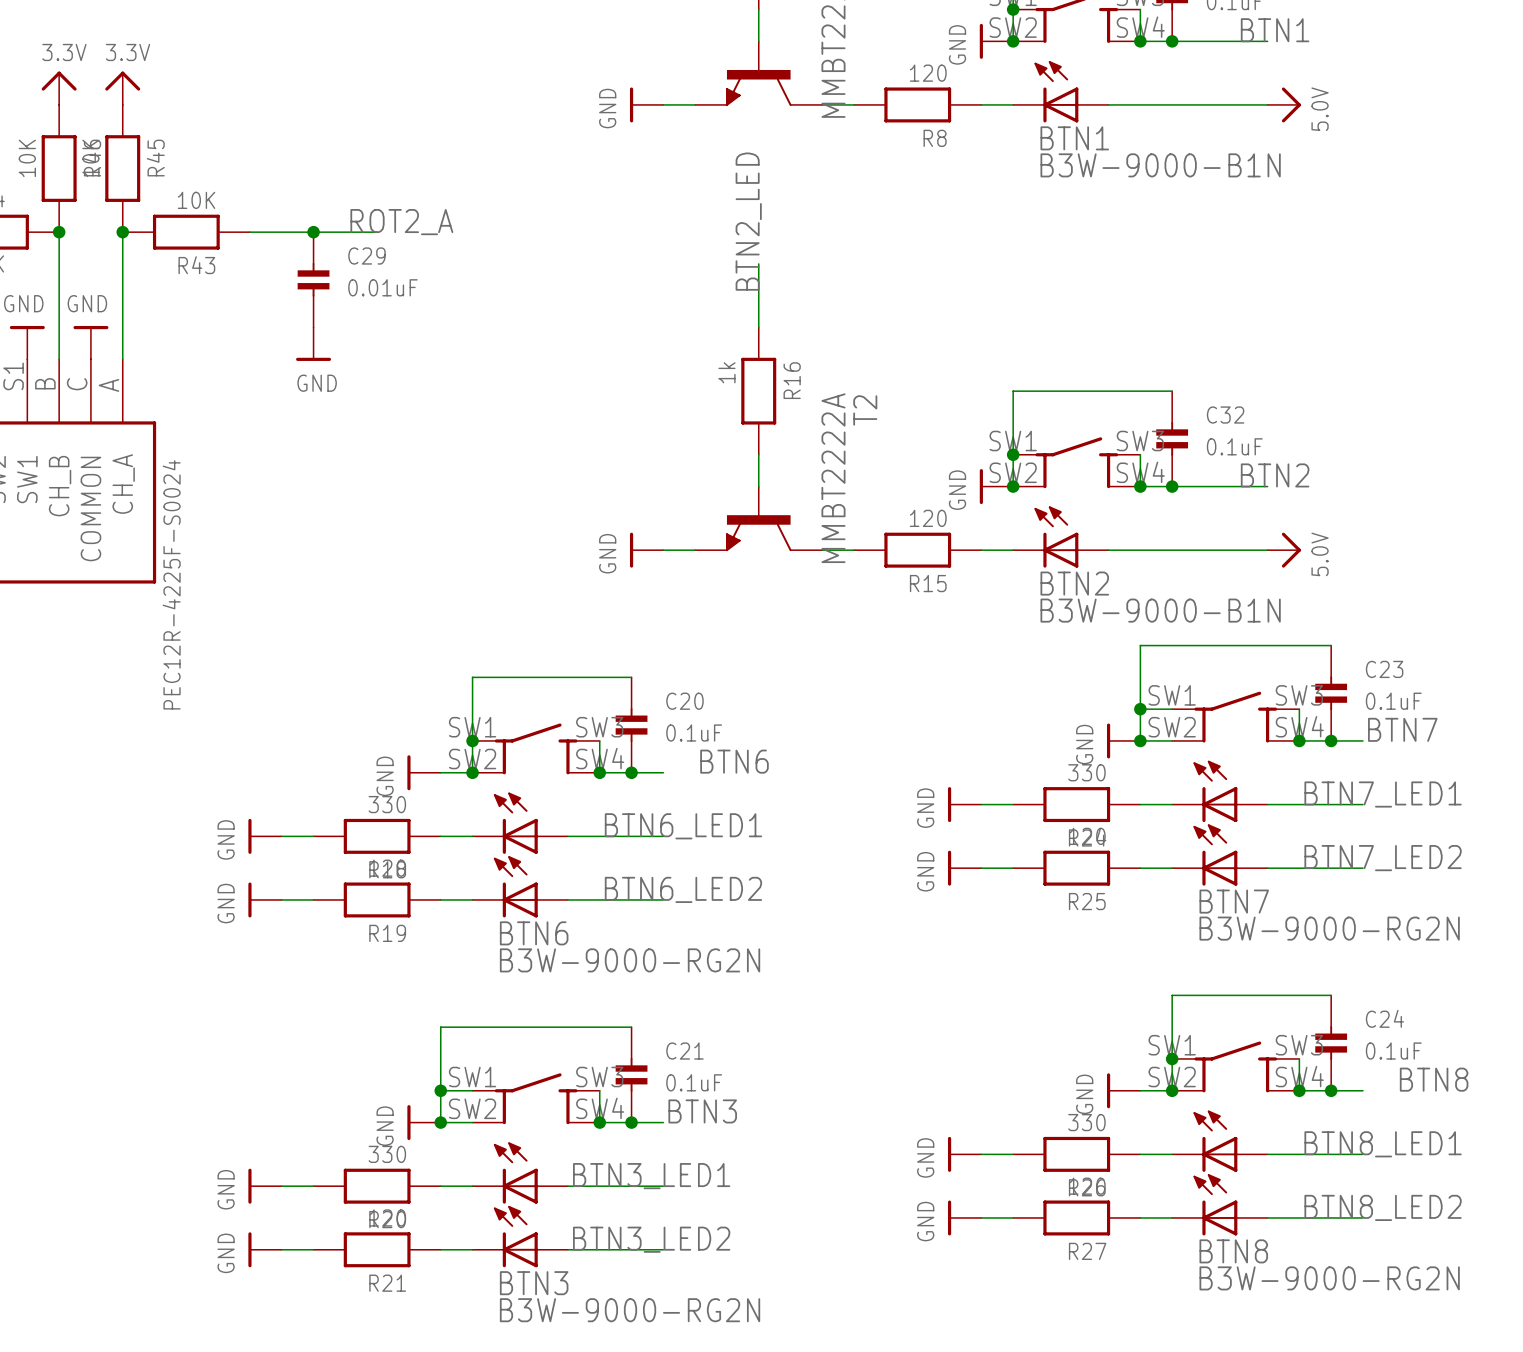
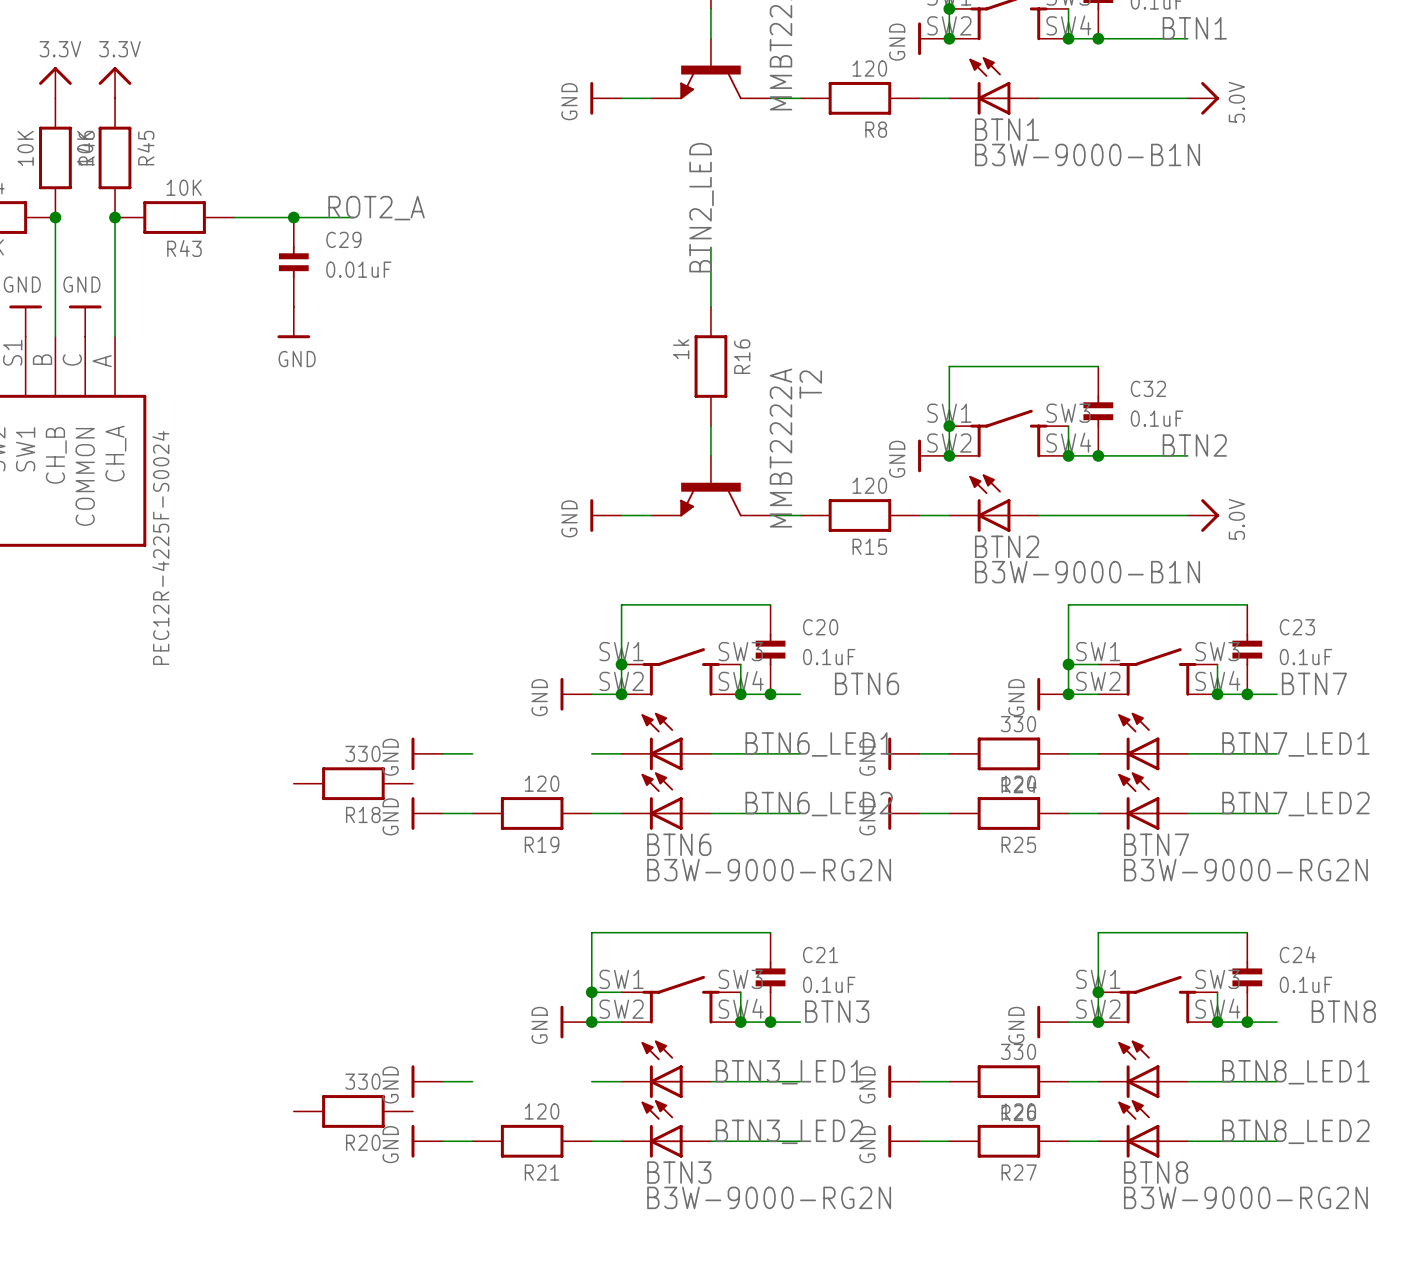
wire: (631, 677) (472, 677) (472, 772) (440, 772) -> (770, 604) (621, 604) (621, 694) (591, 694)
junction: none -> (621, 664)
C20 position: (631, 725) -> (770, 649)
junction: (472, 740) -> none
wire: (599, 740) (599, 772) (663, 772) -> (740, 664) (740, 694) (800, 694)
power symbol: none -> GND (576, 694)
junction: none -> (621, 694)
junction: none -> (740, 694)
junction: none -> (770, 694)
label position: BTN6 (734, 761) -> BTN6 (867, 683)
power symbol position: GND (424, 772) -> GND (427, 753)
junction: (472, 772) -> none
junction: (599, 772) -> none
junction: (631, 772) -> none
BTN6 position: (536, 820) -> (681, 738)
label position: BTN6_LED1 (683, 826) -> BTN6_LED1 (819, 744)
power symbol: GND (265, 836) -> none
wire: (281, 836) (313, 836) -> (442, 753) (472, 753)
wire: (440, 836) (472, 836) -> (591, 753) (621, 753)
wire: (567, 836) (663, 836) -> (710, 753) (800, 753)
power symbol: none -> GND (427, 813)
label position: BTN6_LED2 (683, 889) -> BTN6_LED2 (819, 804)
power symbol: GND (265, 899) -> none
wire: (281, 899) (313, 899) -> (442, 813) (472, 813)
R19 position: (377, 899) -> (532, 813)
wire: (440, 899) (472, 899) -> (591, 813) (621, 813)
wire: (567, 899) (663, 899) -> (710, 813) (800, 813)
wire: (631, 1027) (440, 1027) (440, 1122) (472, 1122) -> (770, 932) (591, 932) (591, 1022) (621, 1022)
junction: none -> (591, 992)
C21 position: (631, 1074) -> (770, 977)
wire: (440, 1090) (472, 1090) -> (591, 992) (621, 992)
junction: (440, 1090) -> none
wire: (599, 1090) (599, 1122) (663, 1122) -> (740, 992) (740, 1022) (800, 1022)
power symbol: none -> GND (576, 1022)
junction: none -> (591, 1022)
junction: none -> (740, 1022)
junction: none -> (770, 1022)
label position: BTN3 (702, 1111) -> BTN3 (837, 1011)
power symbol position: GND (424, 1122) -> GND (427, 1081)
junction: (440, 1122) -> none
junction: (599, 1122) -> none
junction: (631, 1122) -> none
BTN3 position: (536, 1170) -> (681, 1066)
label position: BTN3_LED1 (651, 1176) -> BTN3_LED1 (789, 1072)
power symbol: GND (265, 1186) -> none
wire: (281, 1186) (313, 1186) -> (442, 1081) (472, 1081)
wire: (440, 1186) (472, 1186) -> (591, 1081) (621, 1081)
wire: (567, 1186) (663, 1186) -> (710, 1081) (800, 1081)
power symbol: none -> GND (427, 1141)
label position: BTN3_LED2 (651, 1239) -> BTN3_LED2 (789, 1131)
power symbol: GND (265, 1249) -> none
wire: (281, 1249) (313, 1249) -> (442, 1141) (472, 1141)
R21 position: (377, 1249) -> (532, 1141)
wire: (440, 1249) (472, 1249) -> (591, 1141) (621, 1141)
wire: (567, 1249) (663, 1249) -> (710, 1141) (800, 1141)

